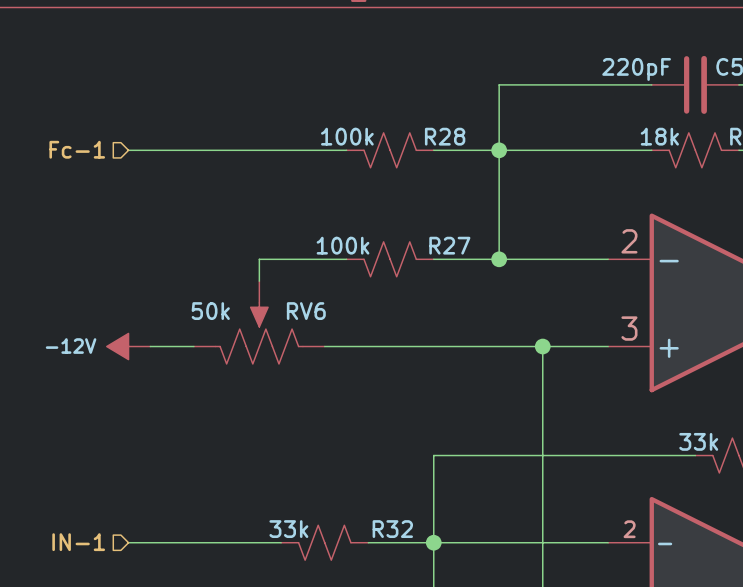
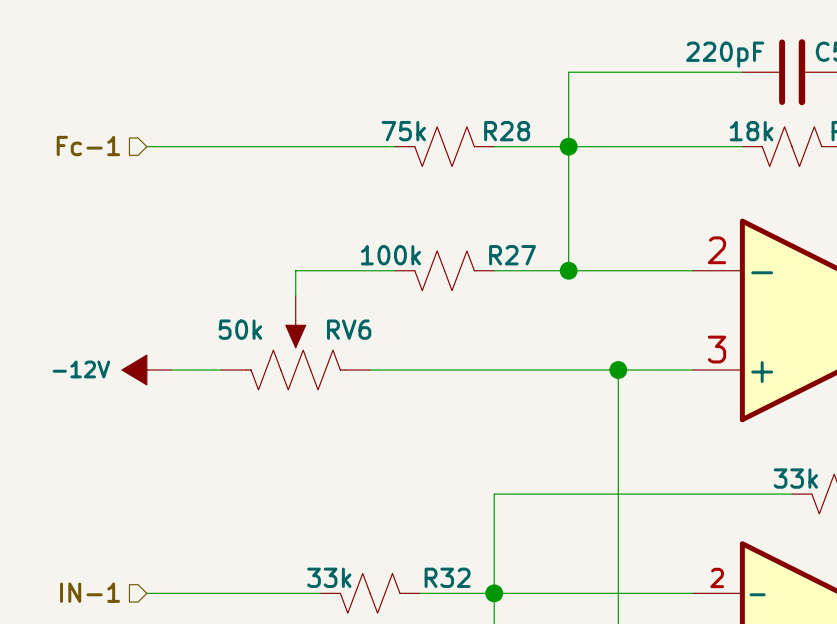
R28 value: 100k (347, 136) -> 75k (403, 131)

